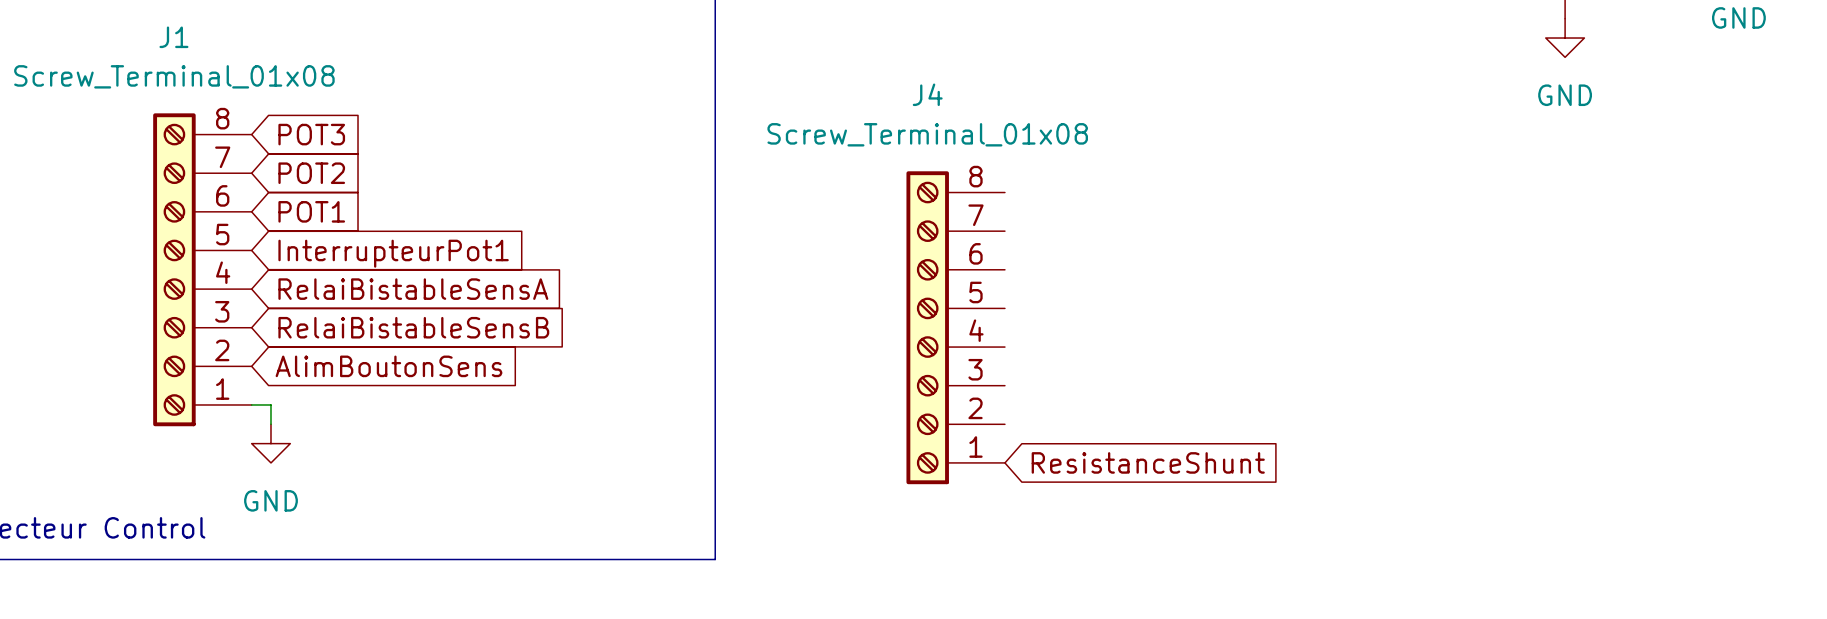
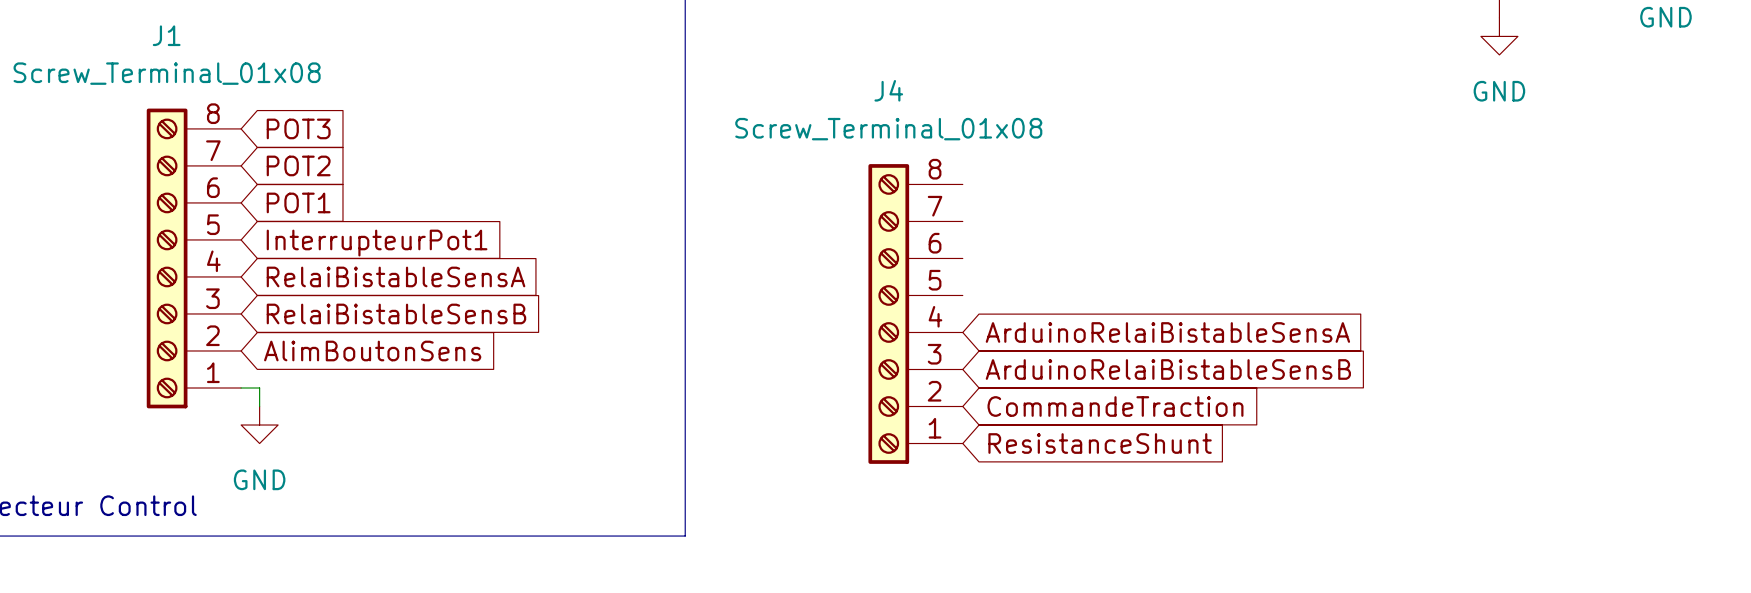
global label: none -> ArduinoRelaiBistableSensA (1167, 332)
global label: none -> ArduinoRelaiBistableSensB (1168, 369)
global label: none -> CommandeTraction (1115, 406)

